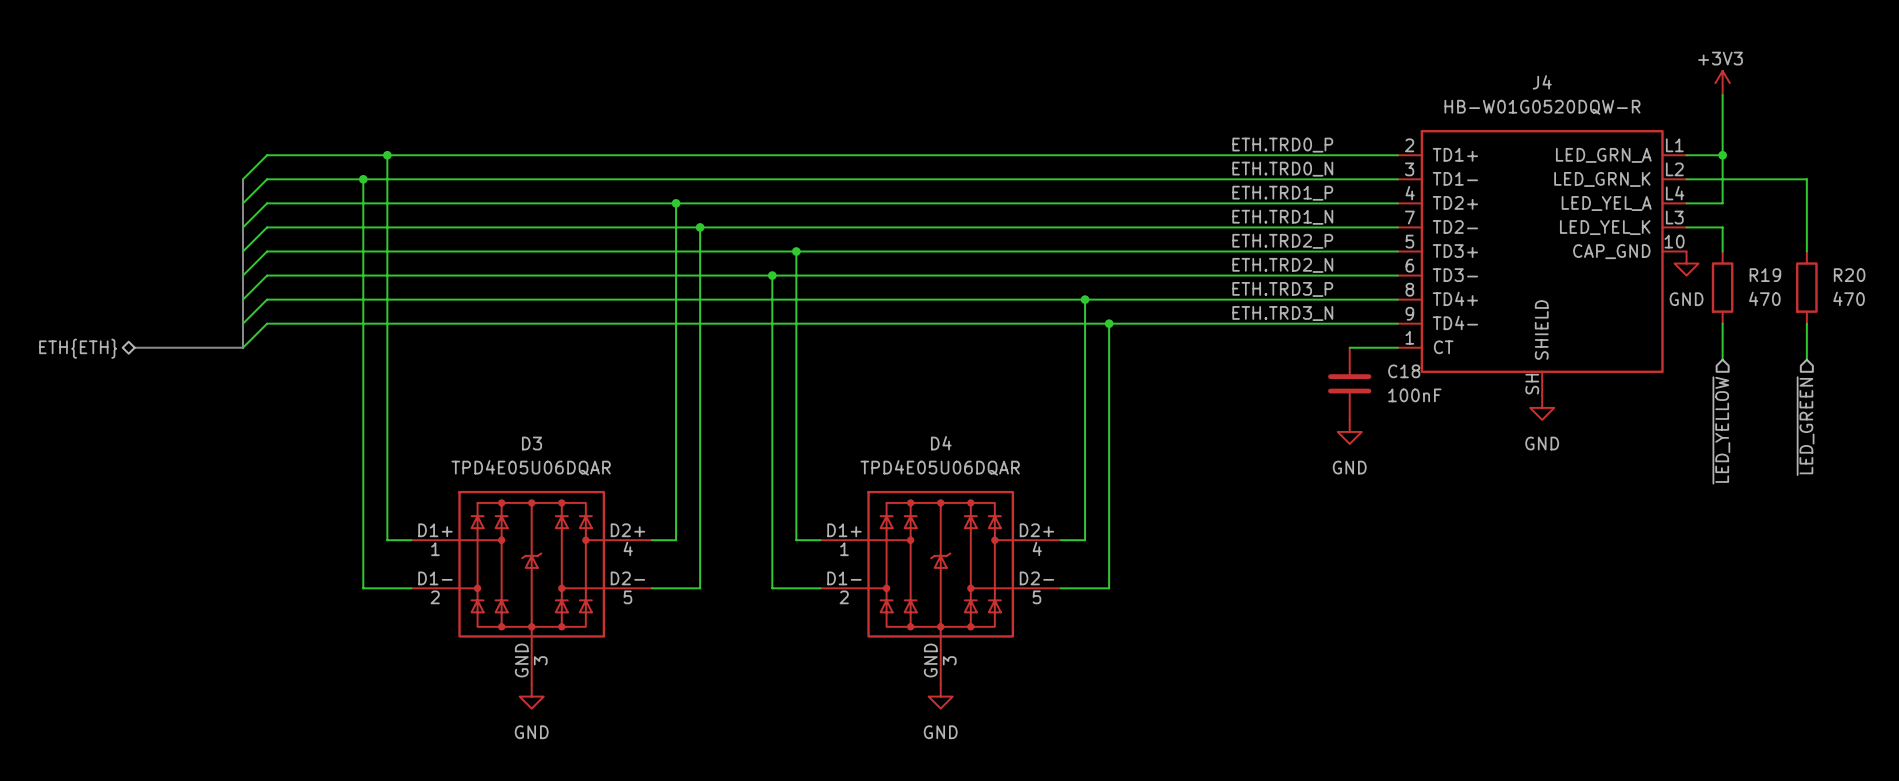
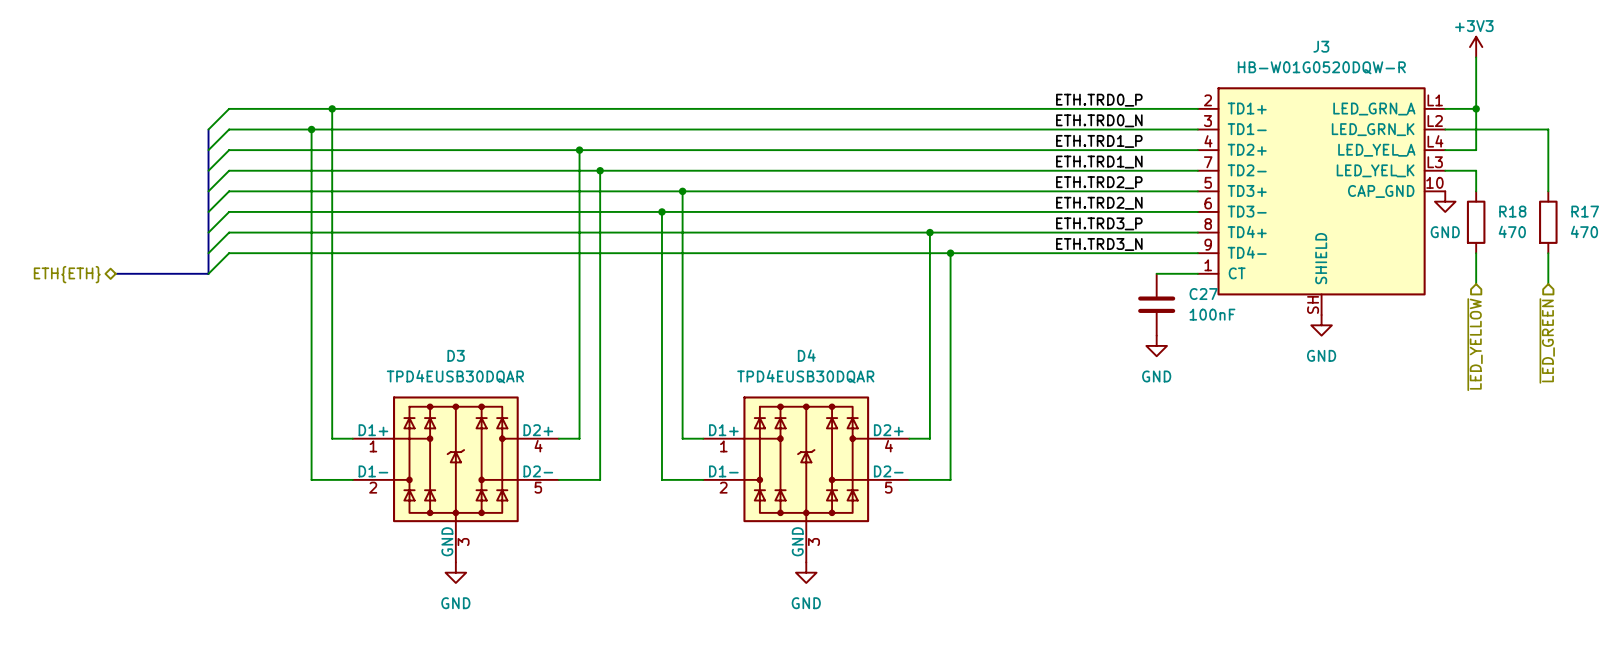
J4 name: J4 (1542, 82) -> J3 (1321, 46)
R19 name: R19 (1765, 275) -> R18 (1512, 211)
R20 name: R20 (1849, 275) -> R17 (1585, 211)
C18 name: C18 (1404, 371) -> C27 (1203, 294)
D3 value: TPD4E05U06DQAR (531, 467) -> TPD4EUSB30DQAR (455, 376)
D4 value: TPD4E05U06DQAR (940, 467) -> TPD4EUSB30DQAR (805, 376)

